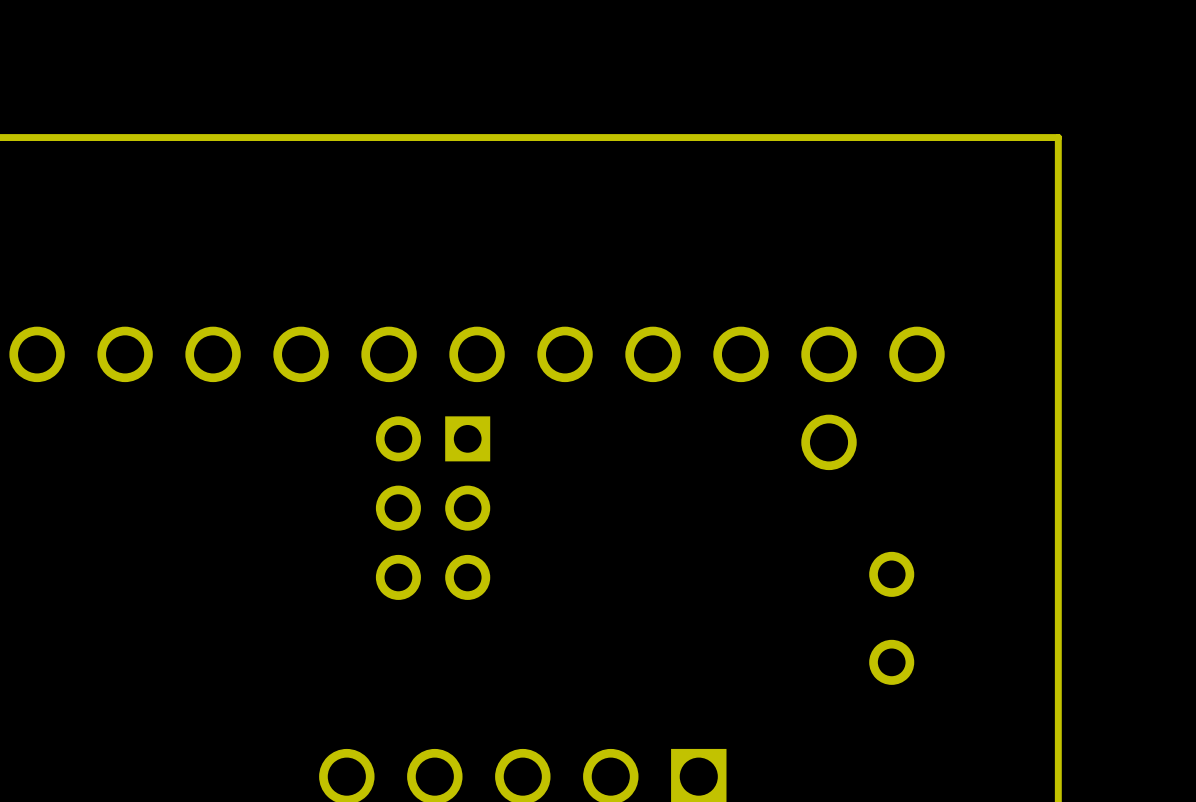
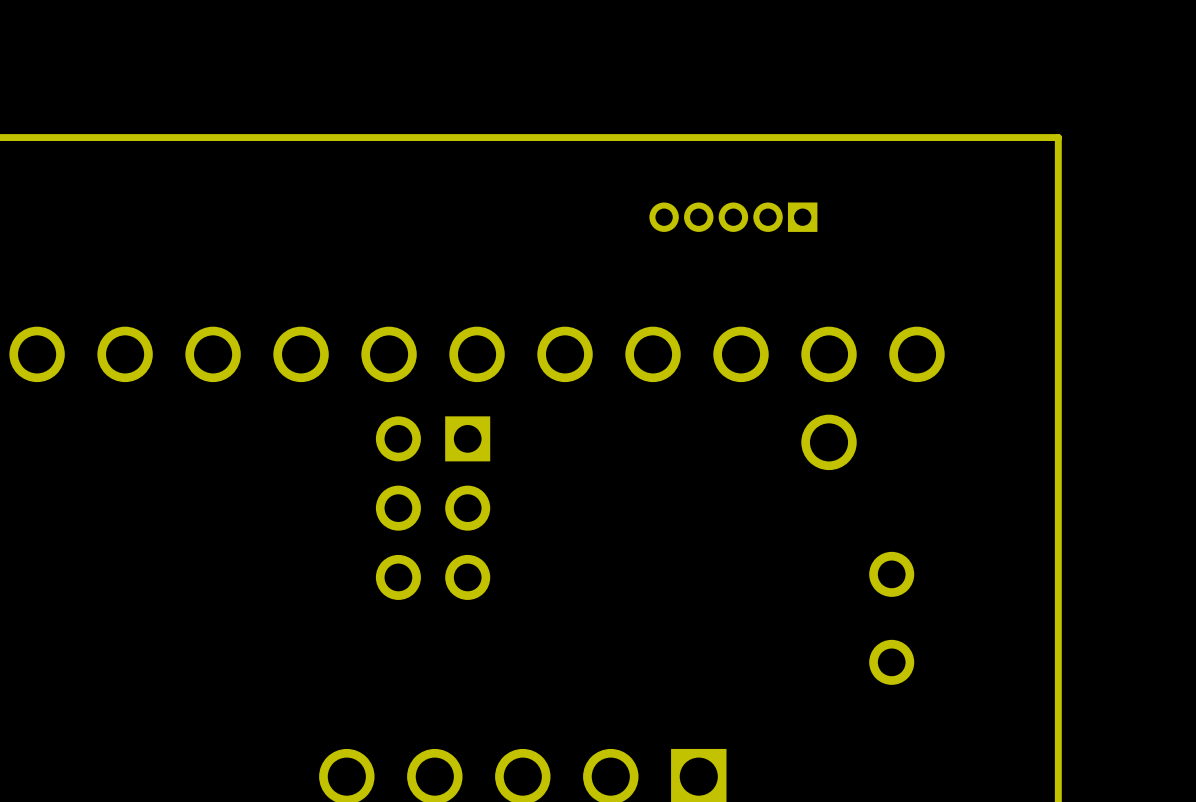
part: none -> (733, 217)

